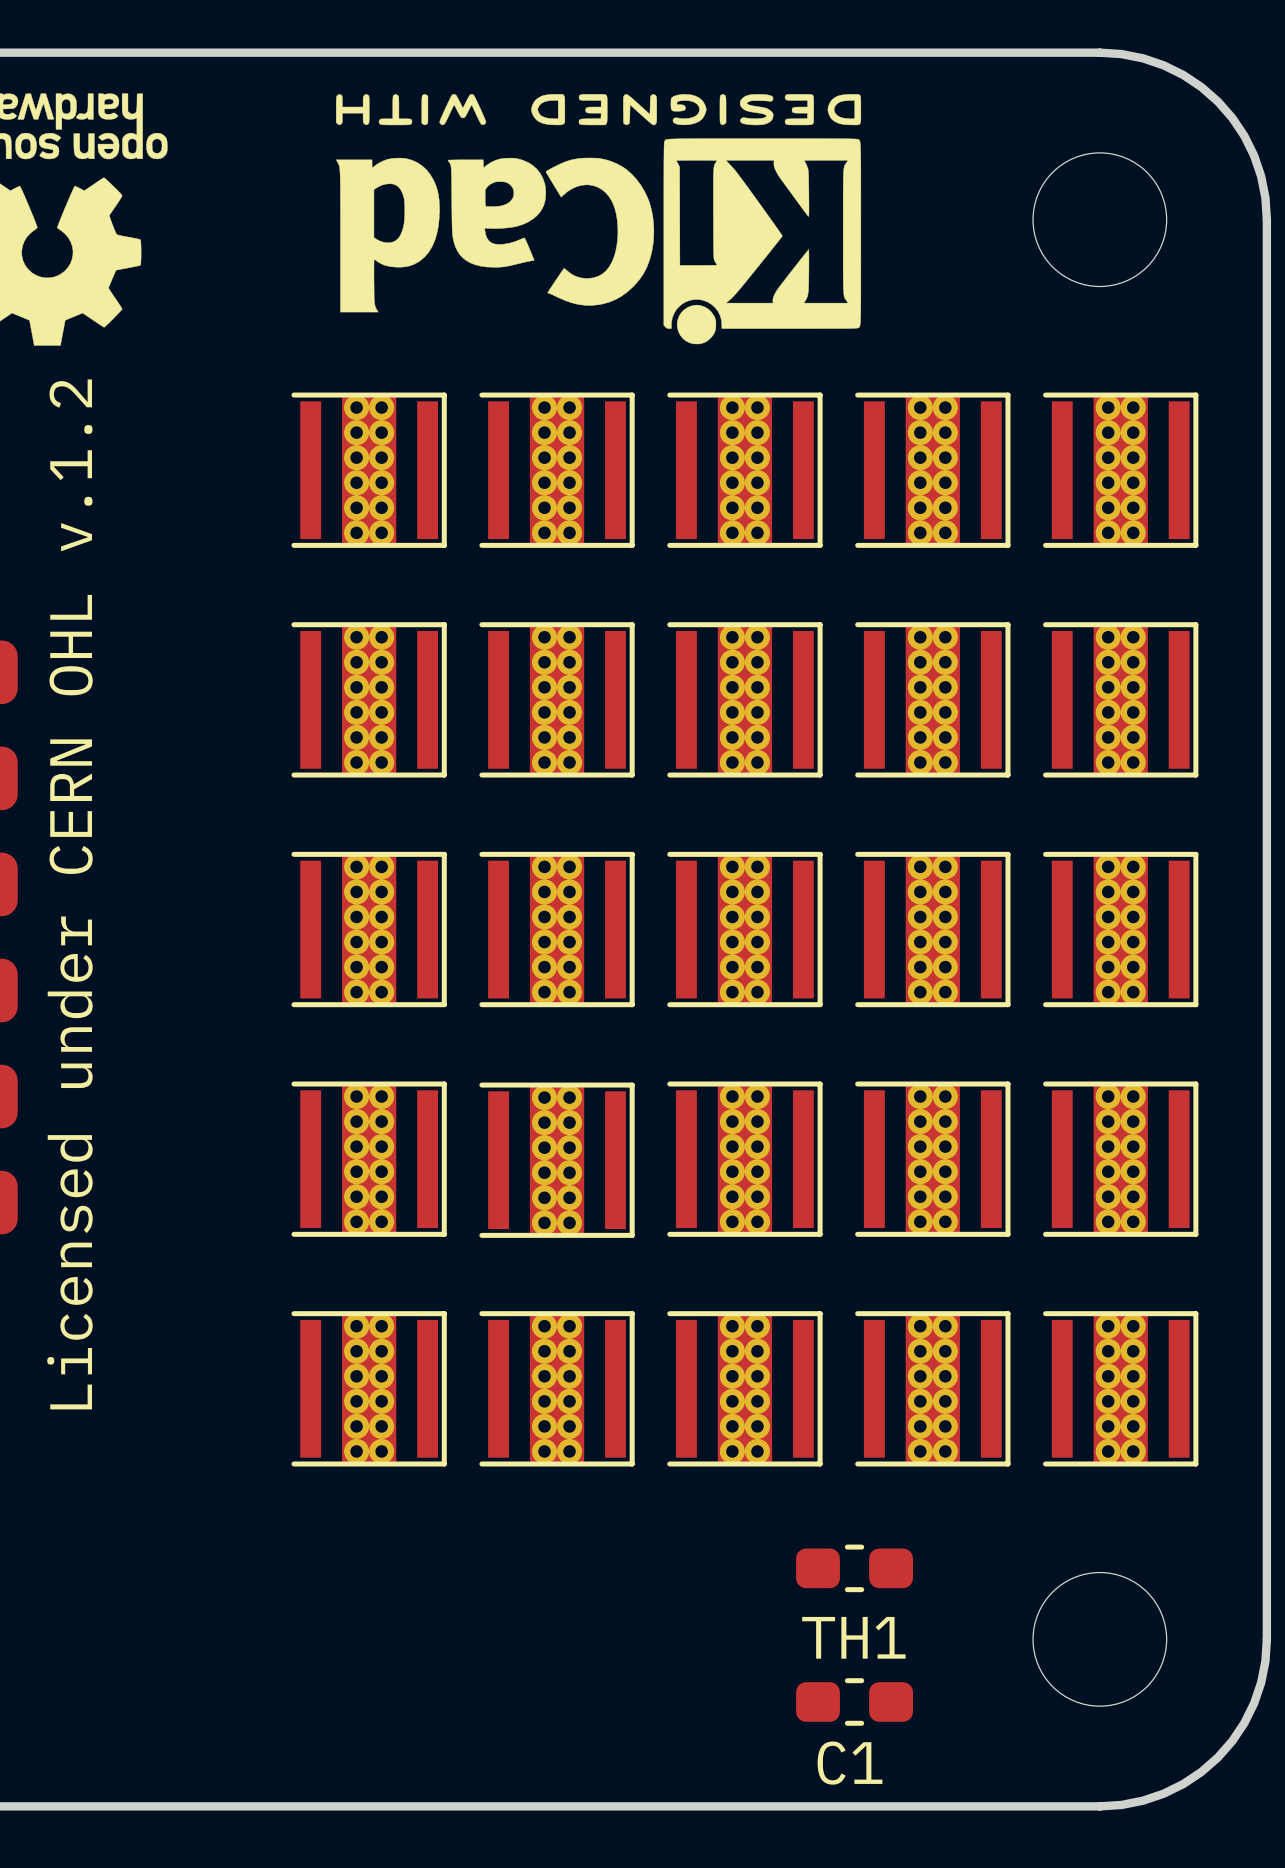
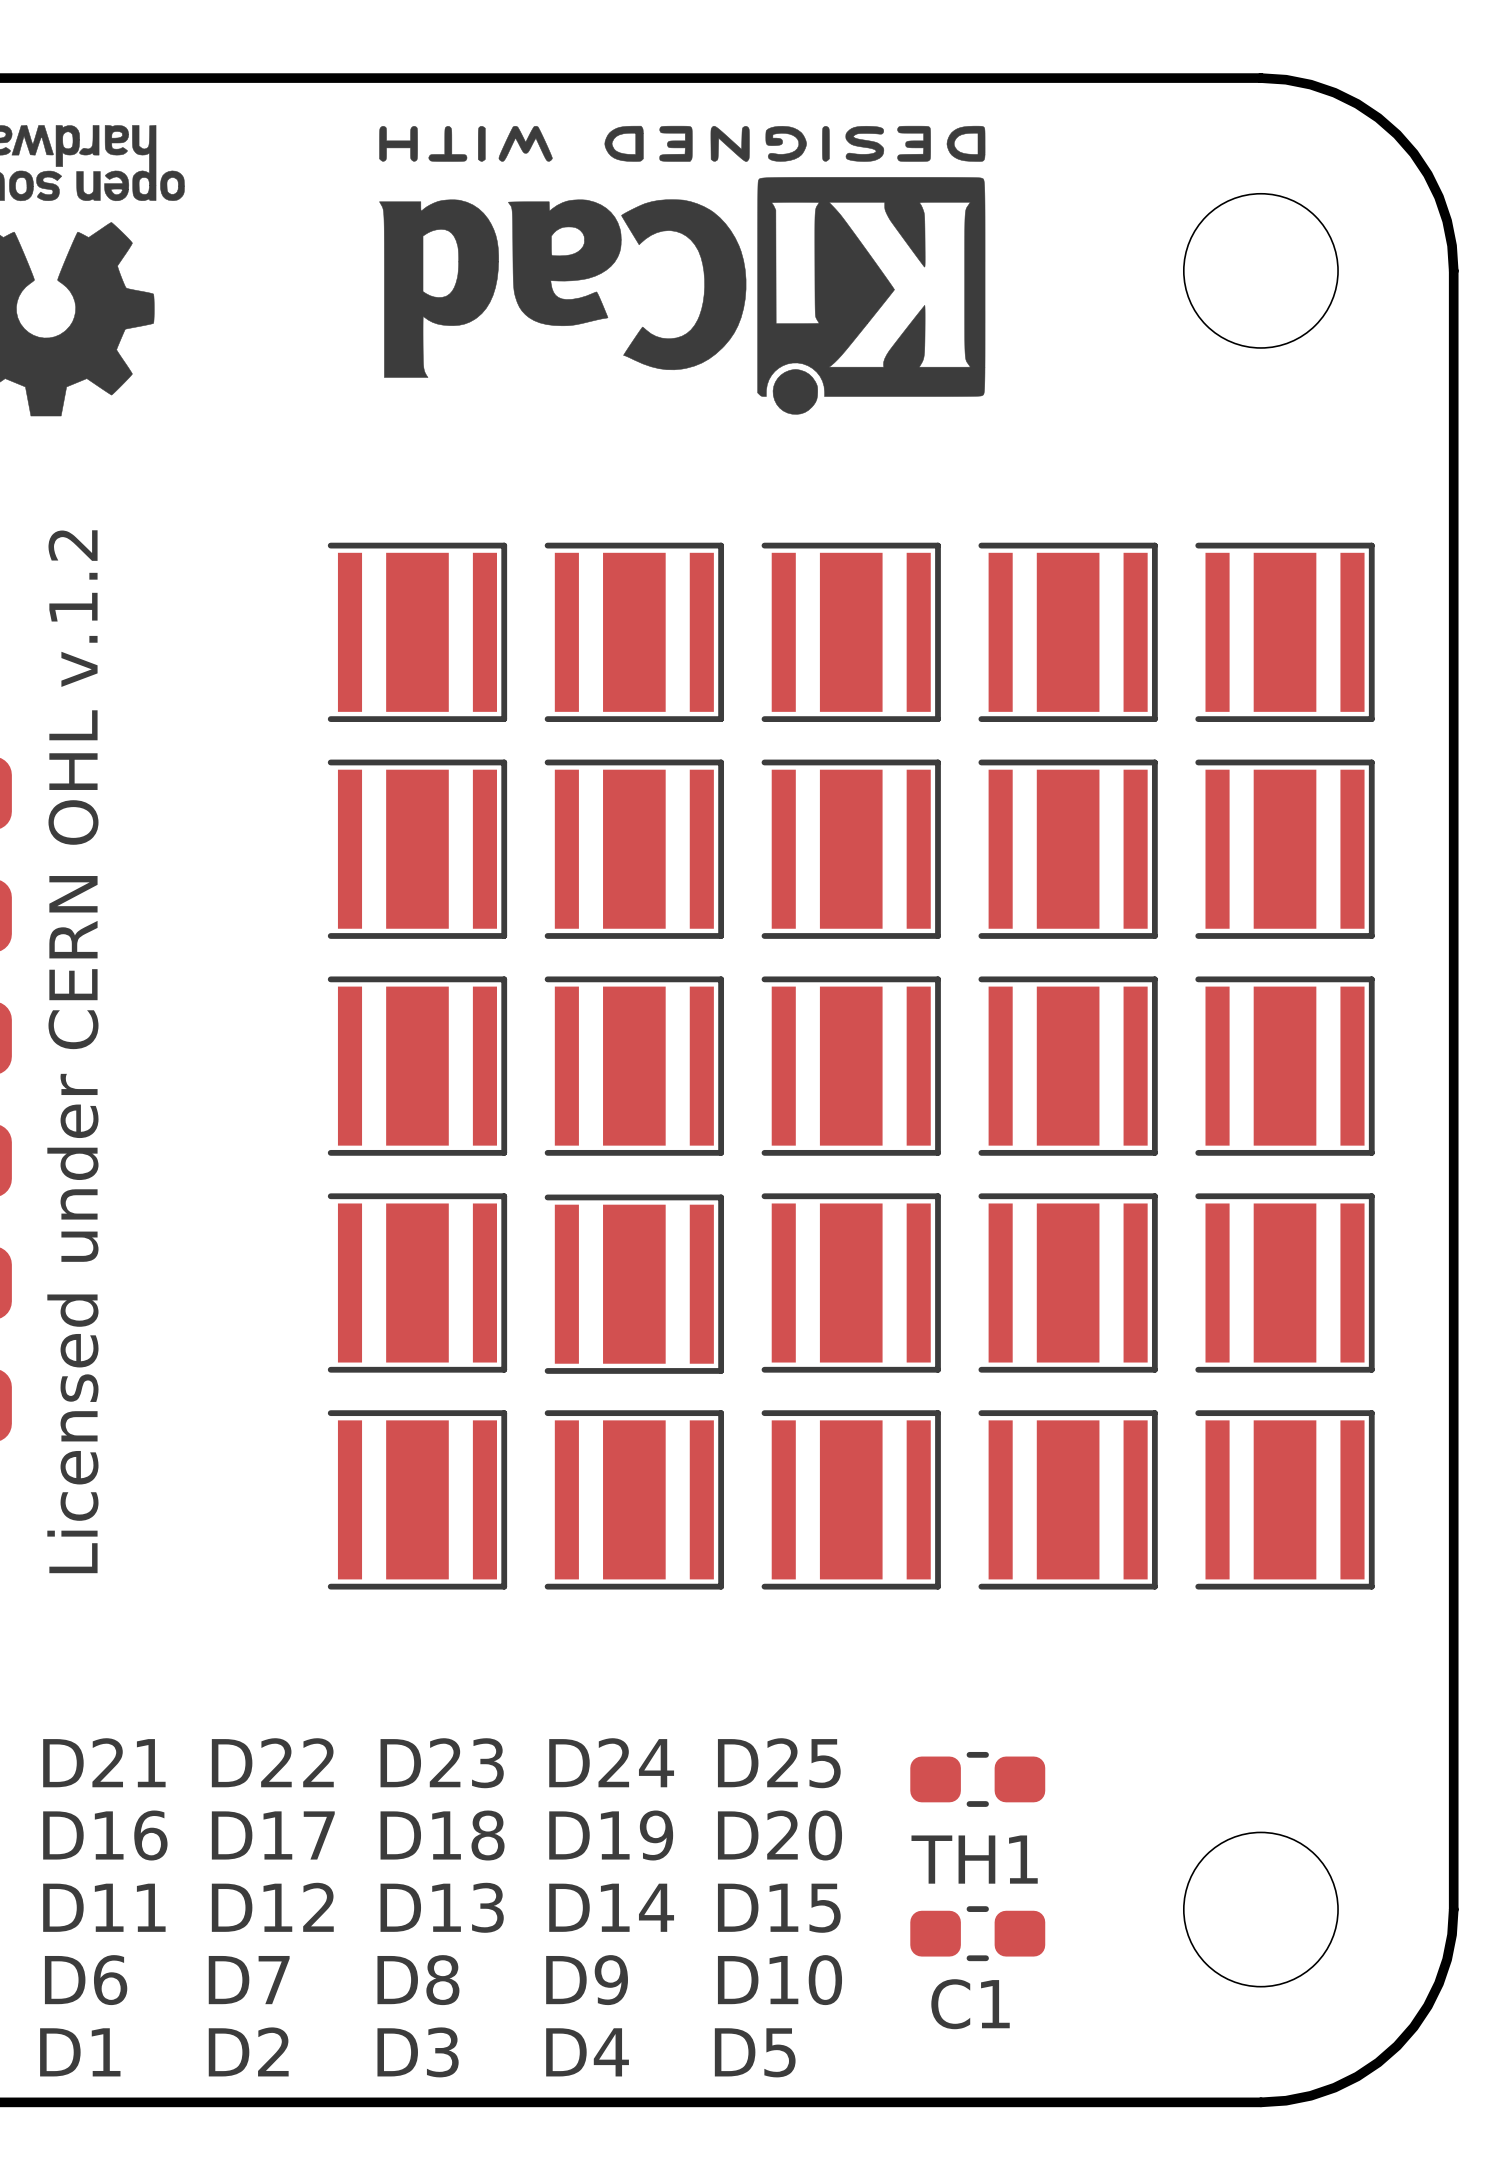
part: (369, 470) -> none
part: (557, 470) -> none
part: (744, 470) -> none
part: (932, 470) -> none
part: (1120, 470) -> none
D21: none -> (417, 632)
D22: none -> (634, 632)
D23: none -> (851, 632)
D24: none -> (1068, 632)
D25: none -> (1285, 632)
part: (369, 699) -> none
part: (557, 699) -> none
part: (744, 699) -> none
part: (932, 699) -> none
part: (1120, 699) -> none
D16: none -> (417, 849)
D17: none -> (634, 849)
D18: none -> (851, 849)
D19: none -> (1068, 849)
D20: none -> (1285, 849)
D11: none -> (417, 1066)
D12: none -> (634, 1066)
D13: none -> (851, 1066)
D14: none -> (1068, 1066)
D15: none -> (1285, 1066)
part: (369, 929) -> none
part: (557, 929) -> none
part: (744, 929) -> none
part: (932, 929) -> none
part: (1120, 929) -> none
D6: none -> (417, 1283)
D8: none -> (851, 1283)
D9: none -> (1068, 1283)
D10: none -> (1285, 1283)
D7: none -> (634, 1284)
part: (369, 1159) -> none
part: (744, 1159) -> none
part: (932, 1159) -> none
part: (1120, 1159) -> none
part: (557, 1160) -> none
D1: none -> (417, 1499)
D2: none -> (634, 1499)
D3: none -> (851, 1499)
D4: none -> (1068, 1499)
D5: none -> (1285, 1499)
part: (369, 1388) -> none
part: (557, 1388) -> none
part: (744, 1388) -> none
part: (932, 1388) -> none
part: (1120, 1388) -> none
TH1 position: (854, 1568) -> (977, 1779)
C1 position: (854, 1701) -> (977, 1933)

